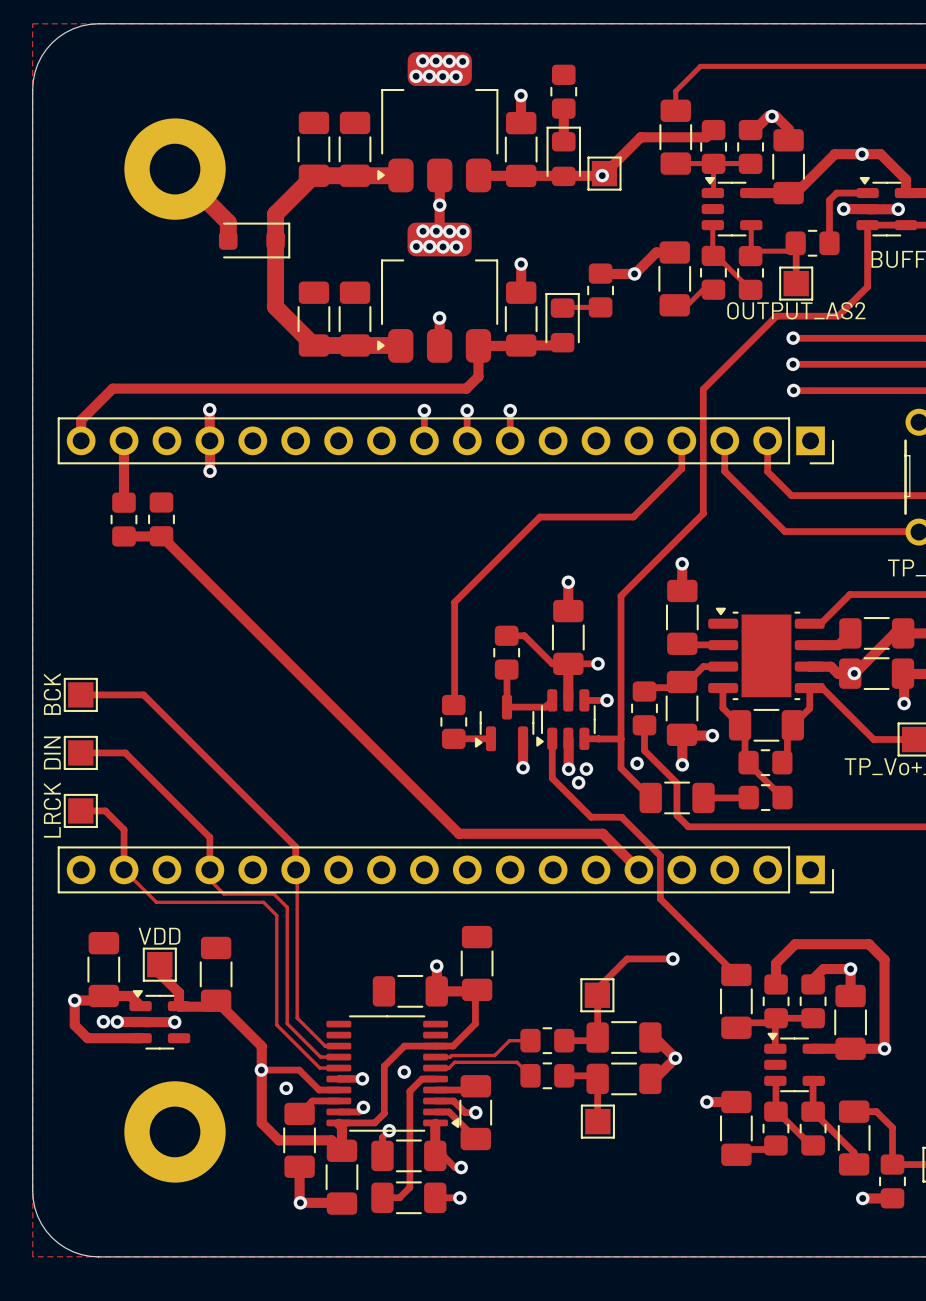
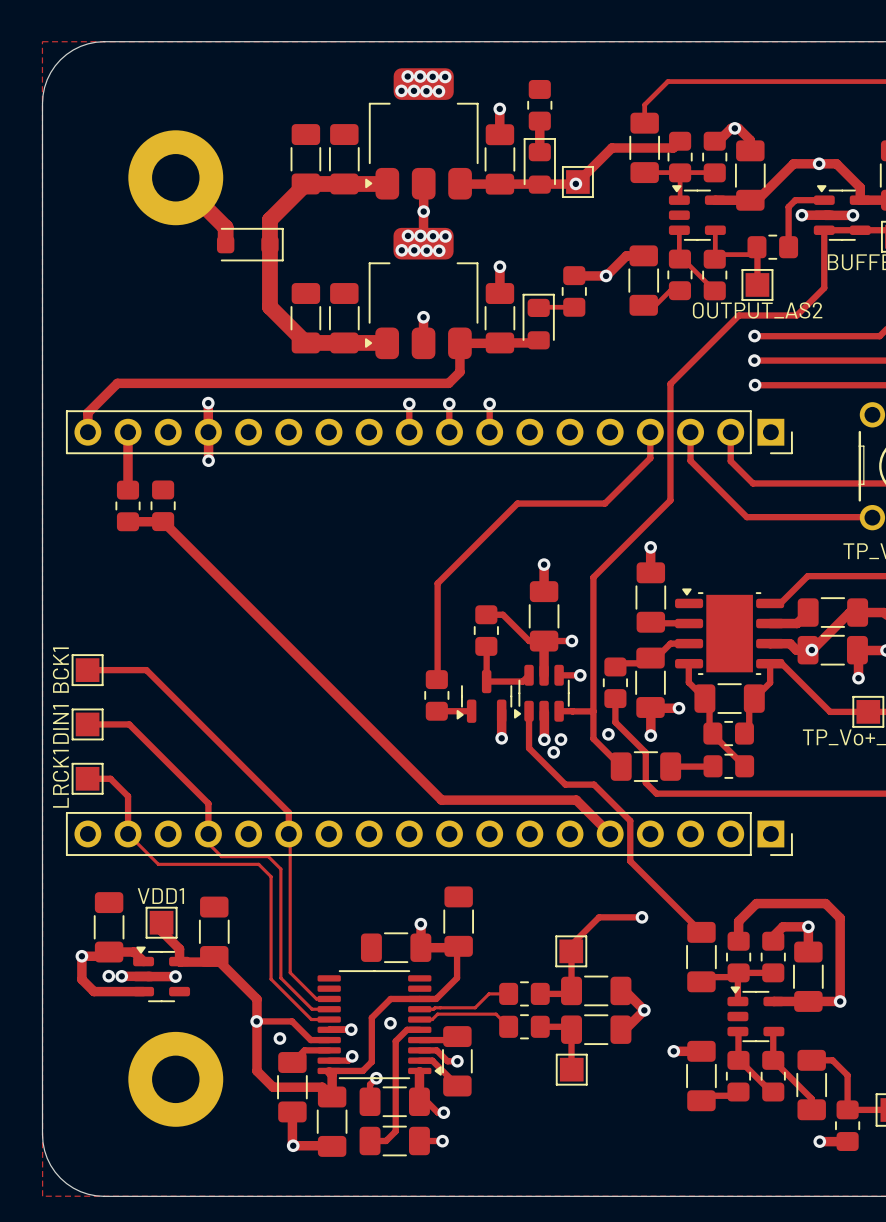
BCK name: BCK (52, 694) -> BCK1 (60, 670)
DIN name: DIN (52, 752) -> DIN1 (60, 724)
LRCK name: LRCK (52, 810) -> LRCK1 (60, 778)
VDD name: VDD (159, 936) -> VDD1 (160, 896)

